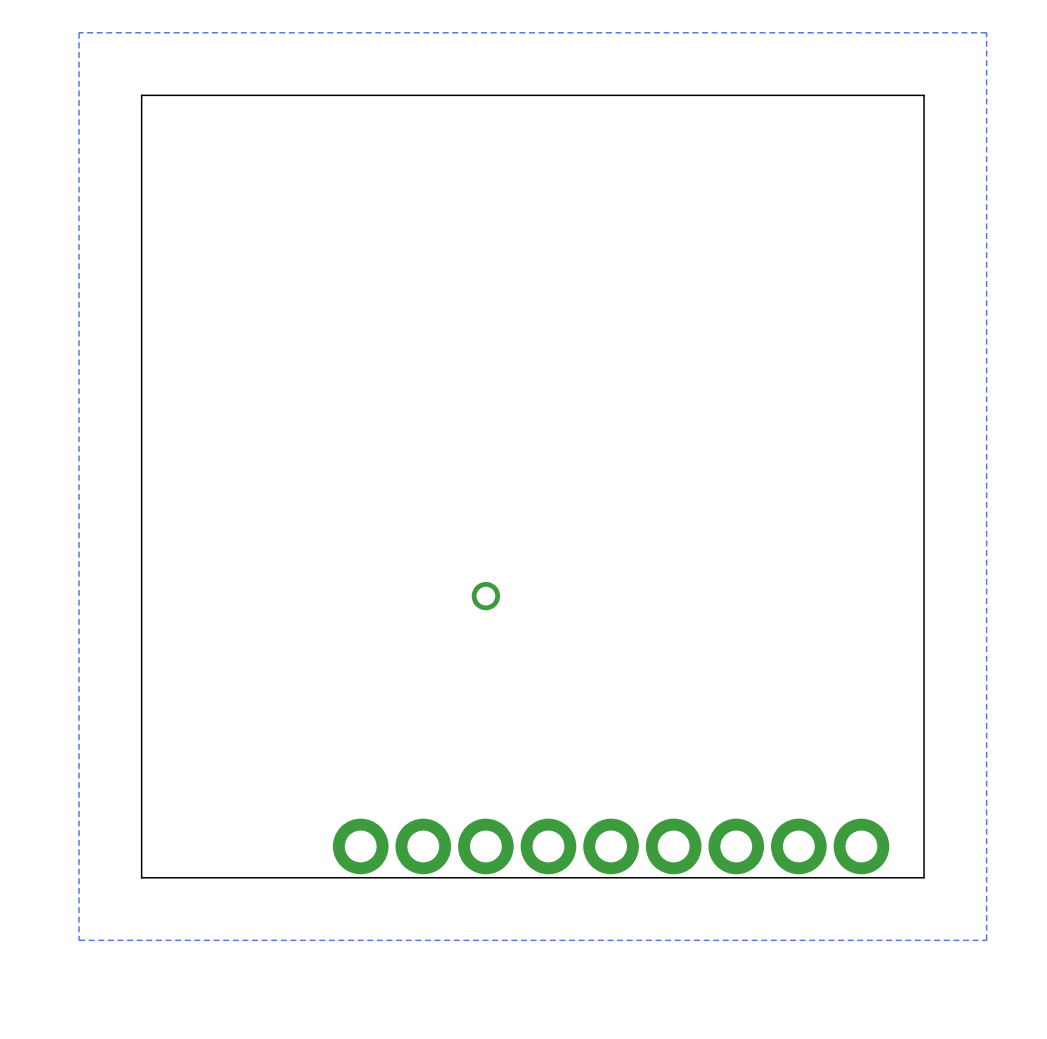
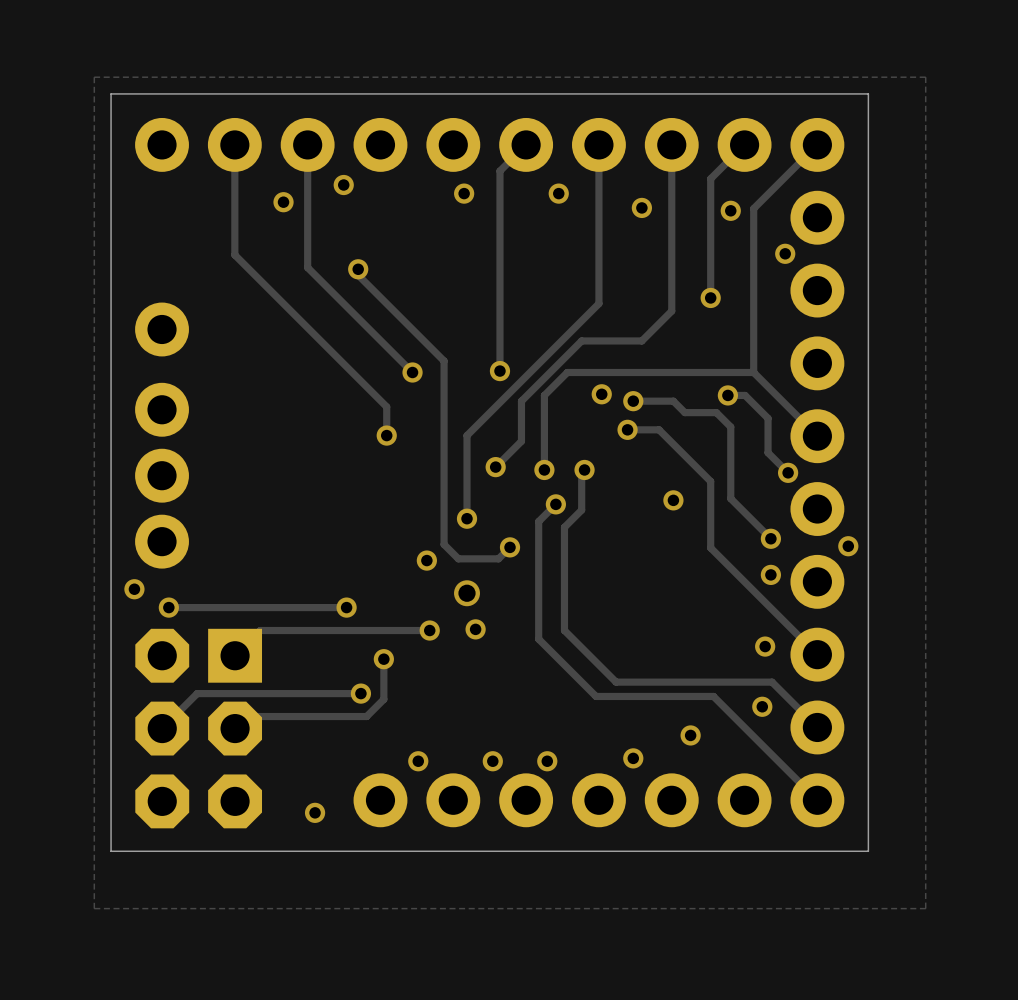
board edge: (924, 95) (141, 95) (141, 877) -> (868, 134) (868, 93) (111, 93) (111, 851) (151, 851)
part: none -> (162, 144)
track: none -> (234, 144) (234, 255) (386, 406) (386, 435)
part: none -> (234, 144)
track: none -> (307, 144) (307, 267) (412, 372)
part: none -> (307, 144)
part: none -> (380, 144)
part: none -> (453, 144)
track: none -> (526, 144) (499, 171) (499, 371)
part: none -> (526, 144)
track: none -> (598, 144) (598, 303) (467, 435) (467, 518)
part: none -> (598, 144)
track: none -> (671, 144) (671, 311) (641, 340) (581, 340) (521, 401) (521, 441) (495, 467)
part: none -> (671, 144)
track: none -> (744, 144) (710, 178) (710, 297)
part: none -> (744, 144)
track: none -> (817, 144) (753, 208) (753, 372)
part: none -> (817, 144)
via: none -> (343, 185)
via: none -> (464, 193)
via: none -> (558, 193)
via: none -> (283, 202)
via: none -> (641, 207)
via: none -> (730, 210)
via: none -> (785, 253)
track: none -> (358, 269) (358, 275) (444, 361) (444, 544) (458, 558) (498, 558) (510, 547)
via: none -> (358, 269)
via: none -> (710, 297)
part: none -> (162, 329)
via: none -> (499, 371)
via: none -> (412, 372)
track: none -> (753, 372) (817, 436)
track: none -> (753, 372) (567, 372) (544, 395) (544, 469)
via: none -> (601, 394)
track: none -> (727, 395) (745, 395) (768, 418) (768, 452) (788, 472)
via: none -> (727, 395)
part: none -> (817, 399)
track: none -> (633, 401) (673, 401) (684, 412) (716, 412) (730, 426) (730, 498) (770, 538)
via: none -> (633, 401)
part: none -> (162, 409)
track: none -> (627, 429) (659, 429) (710, 481) (710, 547) (817, 654)
via: none -> (627, 429)
via: none -> (386, 435)
via: none -> (495, 467)
via: none -> (544, 469)
track: none -> (584, 469) (581, 472) (581, 510) (564, 527) (564, 630) (616, 682) (772, 682) (817, 727)
via: none -> (584, 469)
via: none -> (788, 472)
part: none -> (162, 475)
via: none -> (673, 500)
track: none -> (555, 504) (538, 521) (538, 639) (596, 696) (713, 696) (817, 800)
via: none -> (555, 504)
via: none -> (467, 518)
via: none -> (770, 538)
part: none -> (162, 541)
via: none -> (848, 546)
via: none -> (510, 547)
via: none -> (426, 560)
via: none -> (770, 574)
via: none -> (134, 589)
via: none -> (168, 607)
track: none -> (346, 607) (168, 607)
via: none -> (346, 607)
via: none -> (475, 629)
track: none -> (429, 630) (260, 630) (235, 655)
via: none -> (429, 630)
via: none -> (765, 646)
part: none -> (817, 654)
track: none -> (383, 659) (383, 699) (366, 716) (247, 716) (235, 728)
via: none -> (383, 659)
track: none -> (360, 693) (197, 693) (162, 728)
via: none -> (360, 693)
via: none -> (762, 706)
part: none -> (817, 727)
part: none -> (198, 728)
via: none -> (690, 735)
via: none -> (633, 758)
via: none -> (418, 761)
via: none -> (492, 761)
via: none -> (547, 761)
part footprint: [520, 818, 577, 875] -> [499, 773, 554, 828]
part footprint: [771, 818, 827, 875] -> [717, 773, 772, 828]
part footprint: [833, 818, 890, 875] -> [790, 773, 845, 828]
part: none -> (380, 800)
part: none -> (453, 800)
part: none -> (598, 800)
part: none -> (671, 800)
via: none -> (315, 812)
part: (360, 846) -> none
part: (423, 846) -> none
part: (485, 846) -> none
part: (611, 846) -> none
part: (673, 846) -> none
part: (736, 846) -> none

